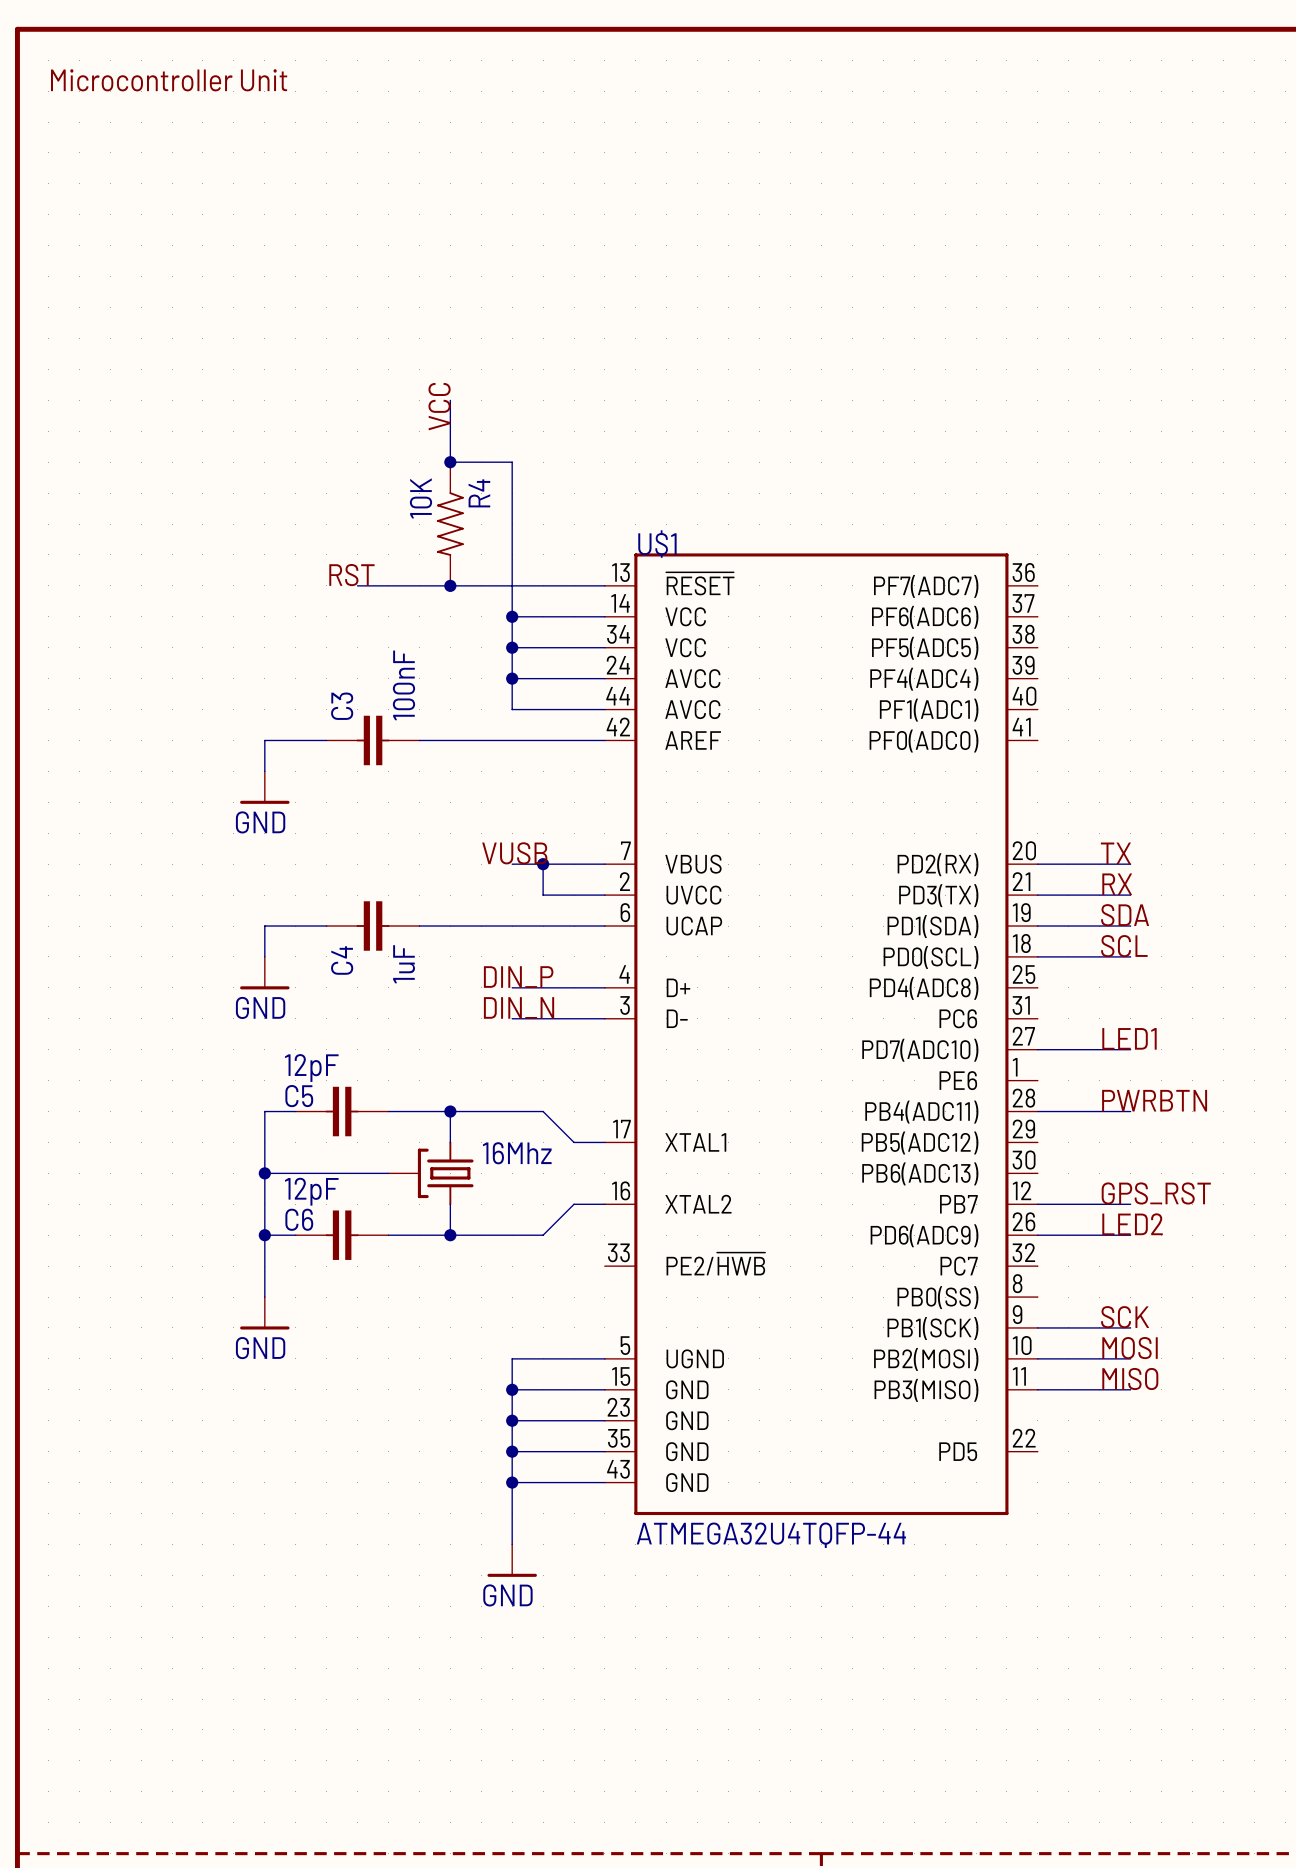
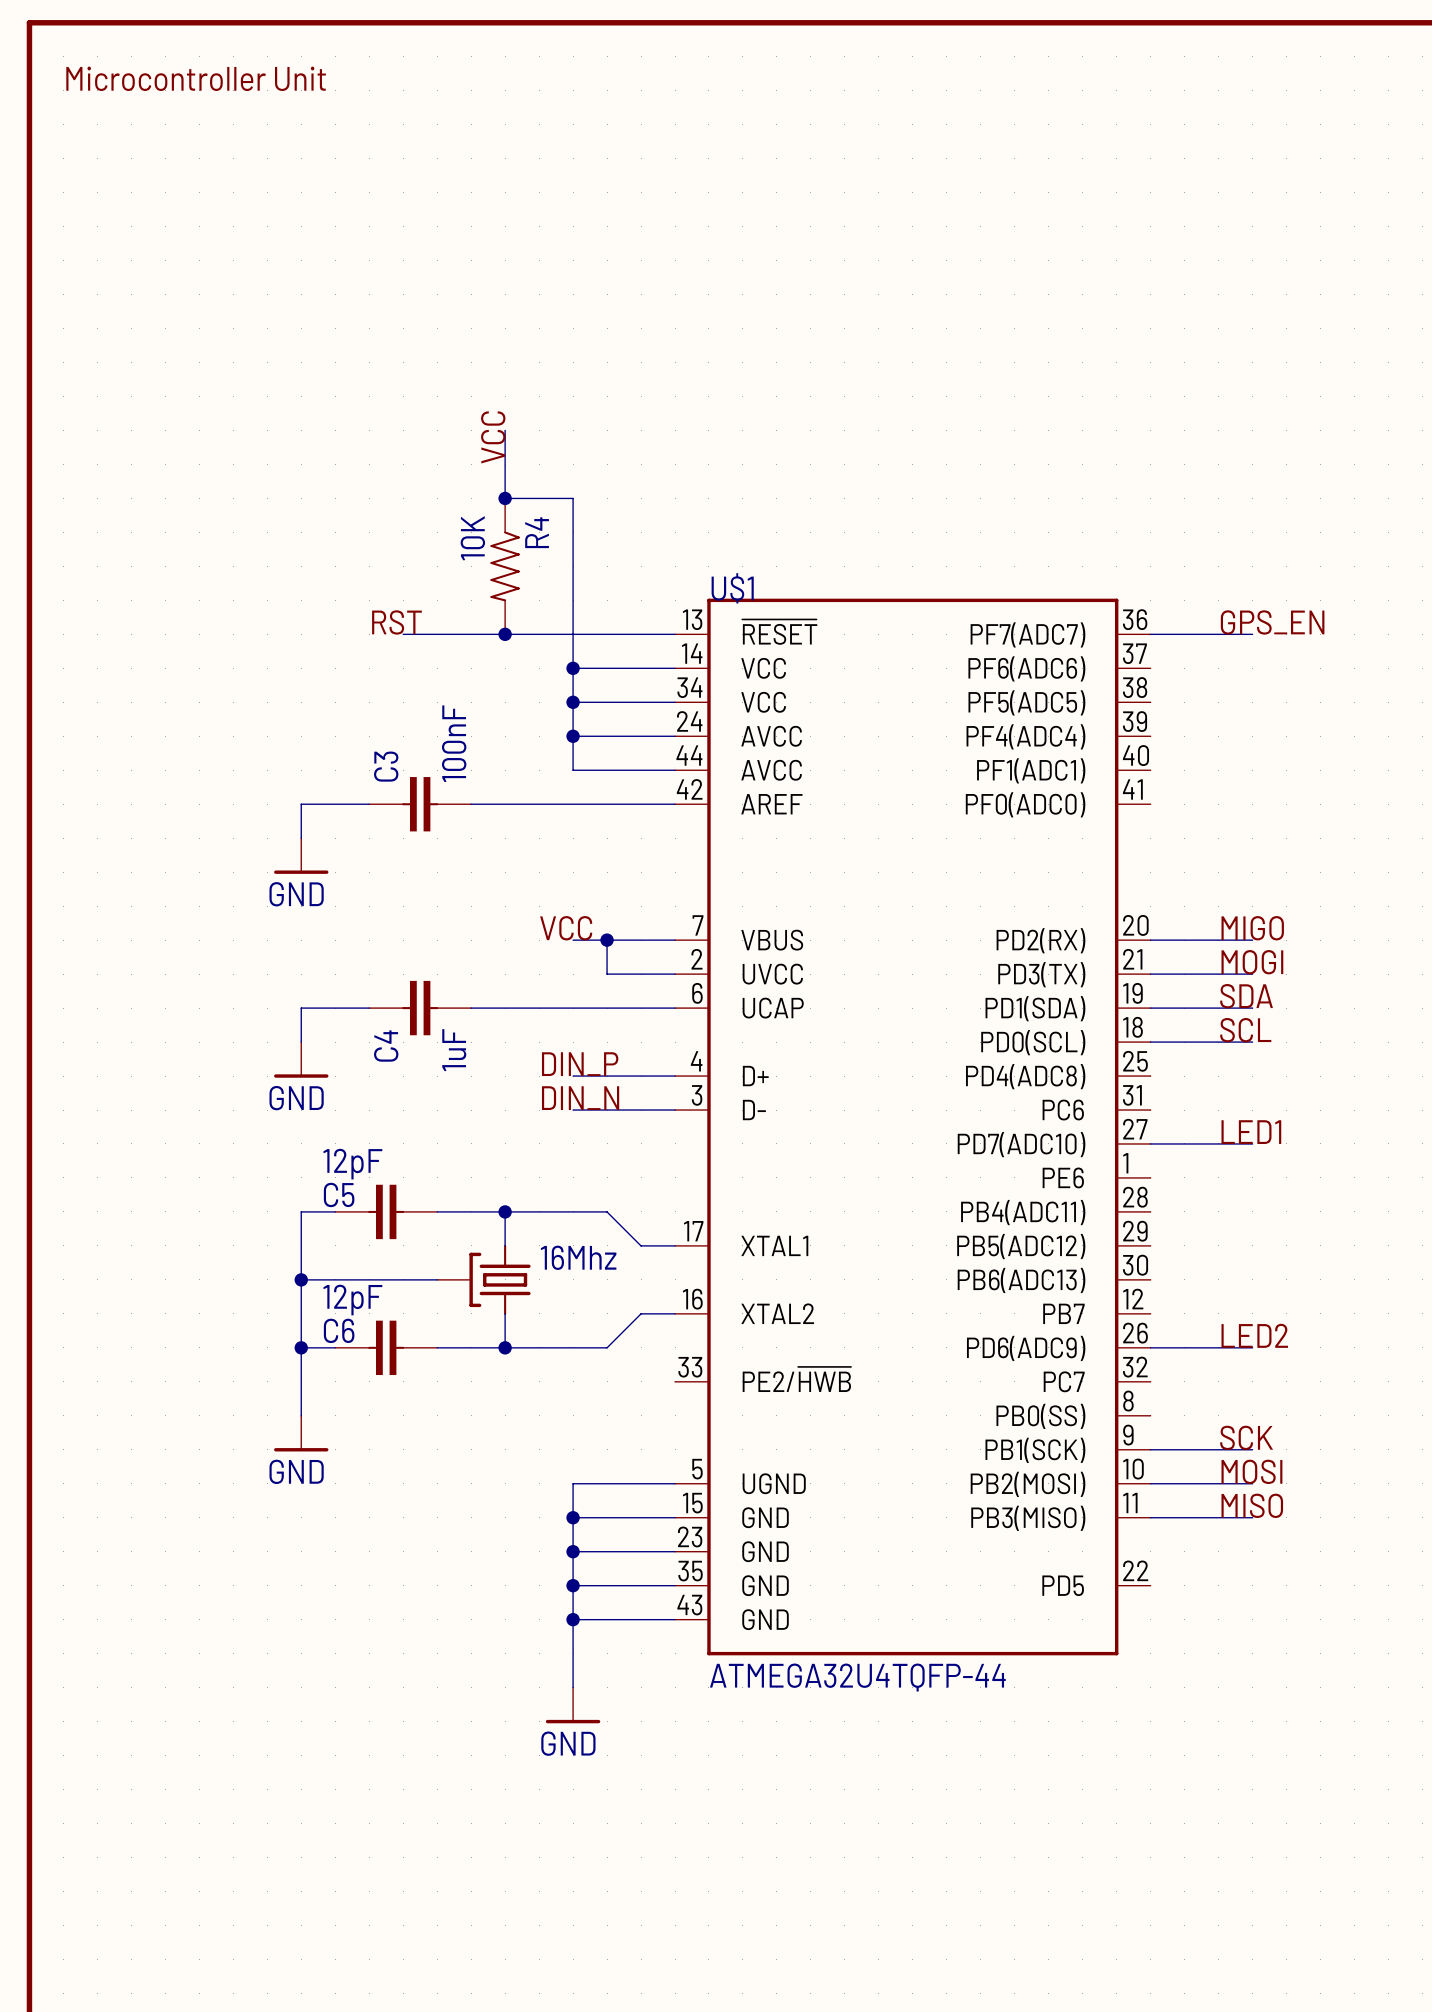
label: none -> GPS_EN (1272, 622)
wire: none -> (1150, 634) (1252, 634)
label: VUSB (514, 853) -> VCC (566, 928)
label: TX (1115, 853) -> MIGO (1252, 928)
label: RX (1117, 884) -> MOGI (1252, 962)
label: PWRBTN (1154, 1100) -> none
wire: (1037, 1111) (1130, 1111) -> none
label: GPS_RST (1156, 1193) -> none
wire: (1037, 1204) (1130, 1204) -> none

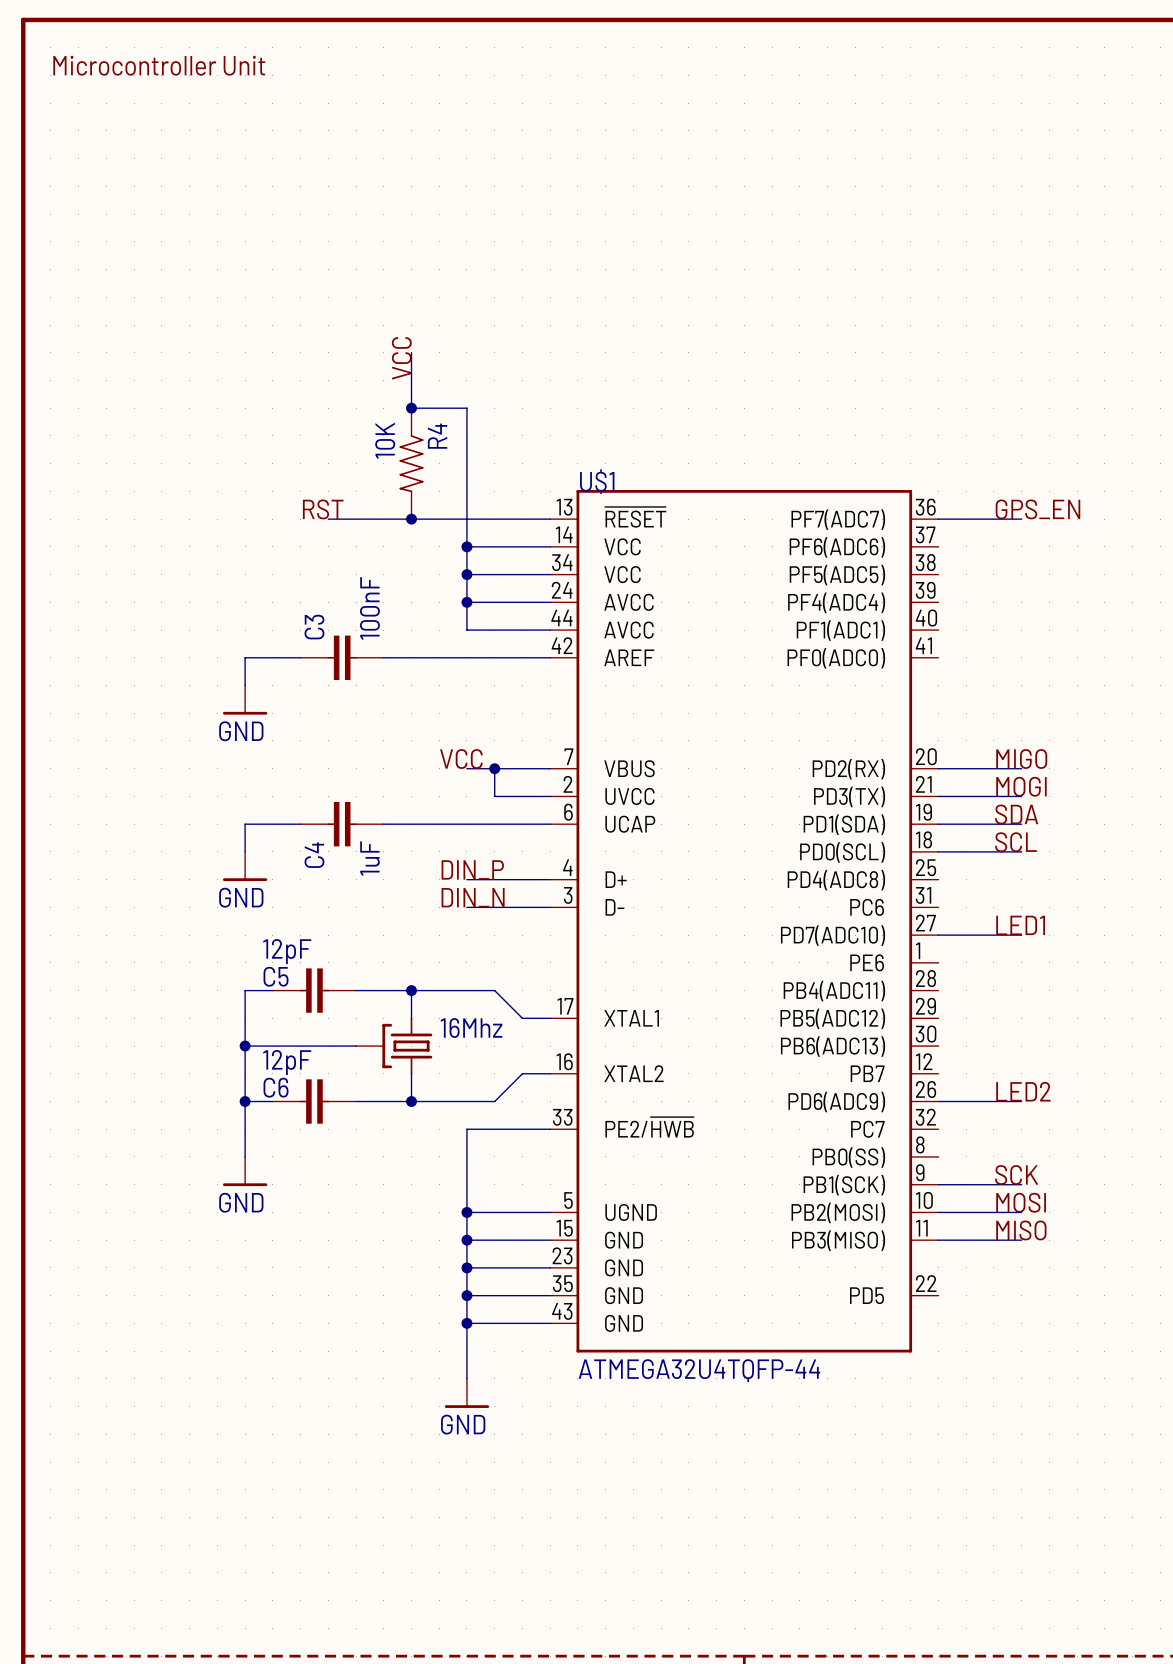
wire: none -> (550, 1129) (466, 1129) (466, 1212)
junction: none -> (466, 1212)

